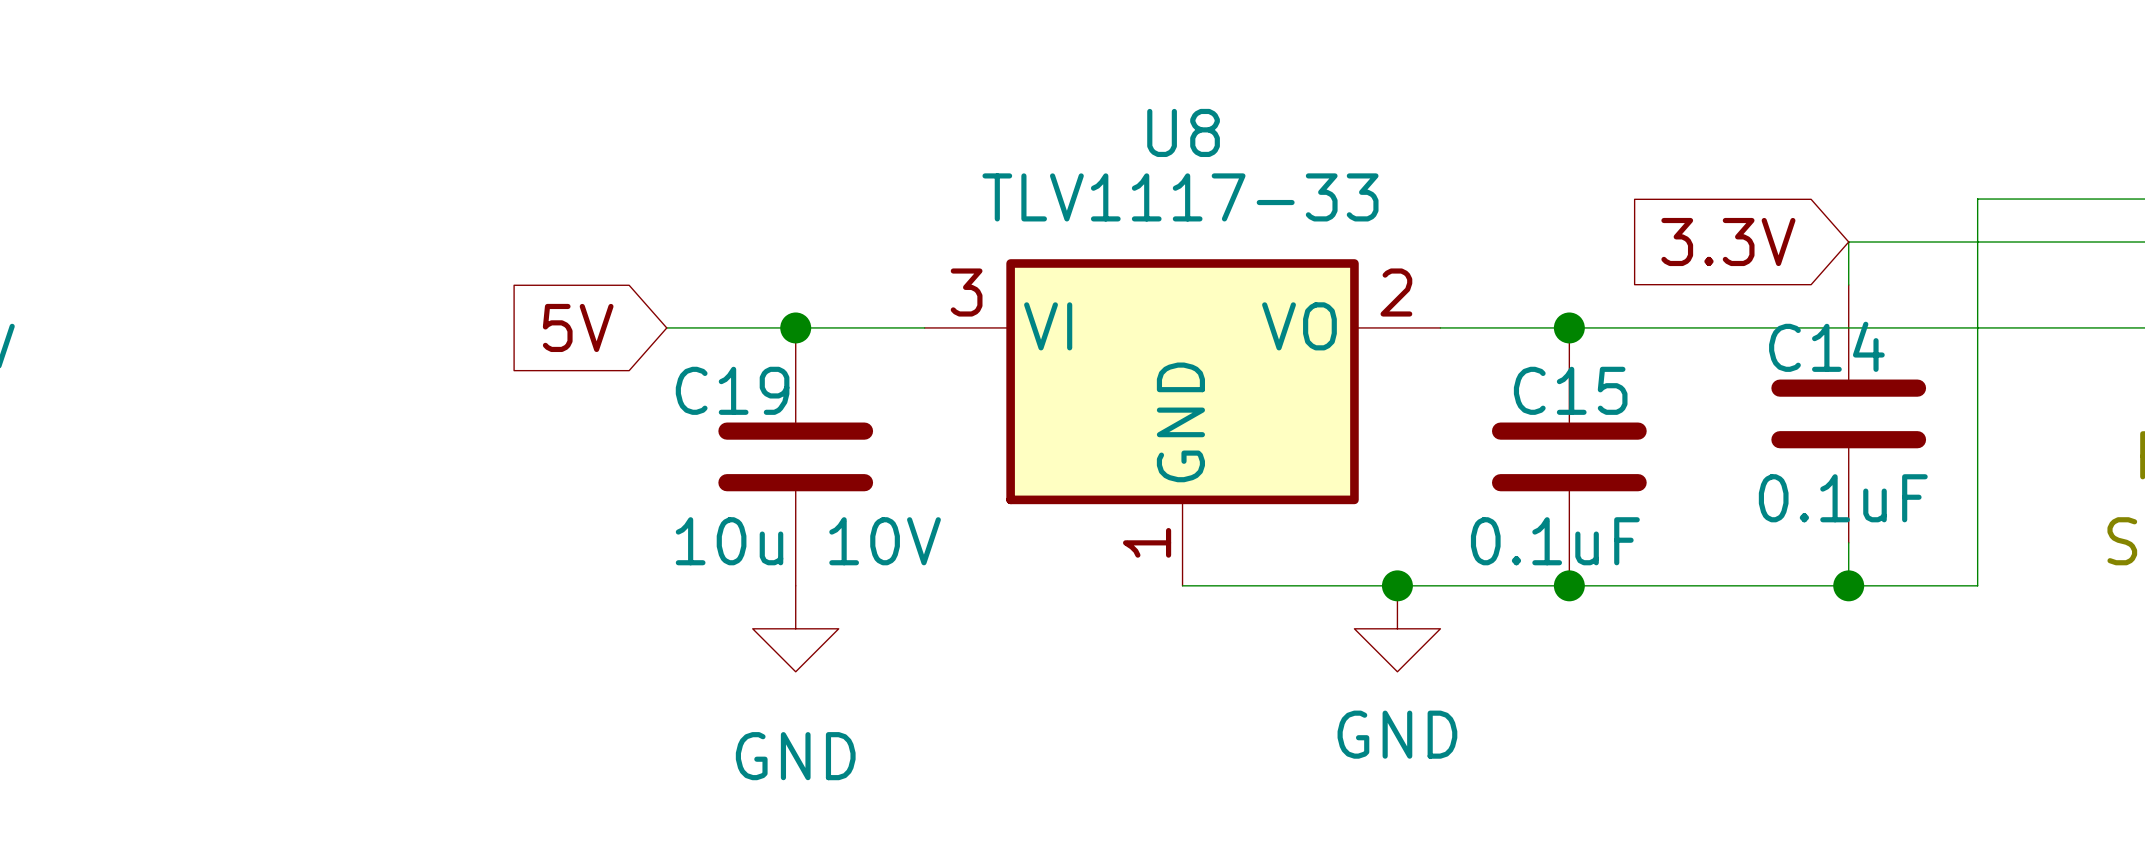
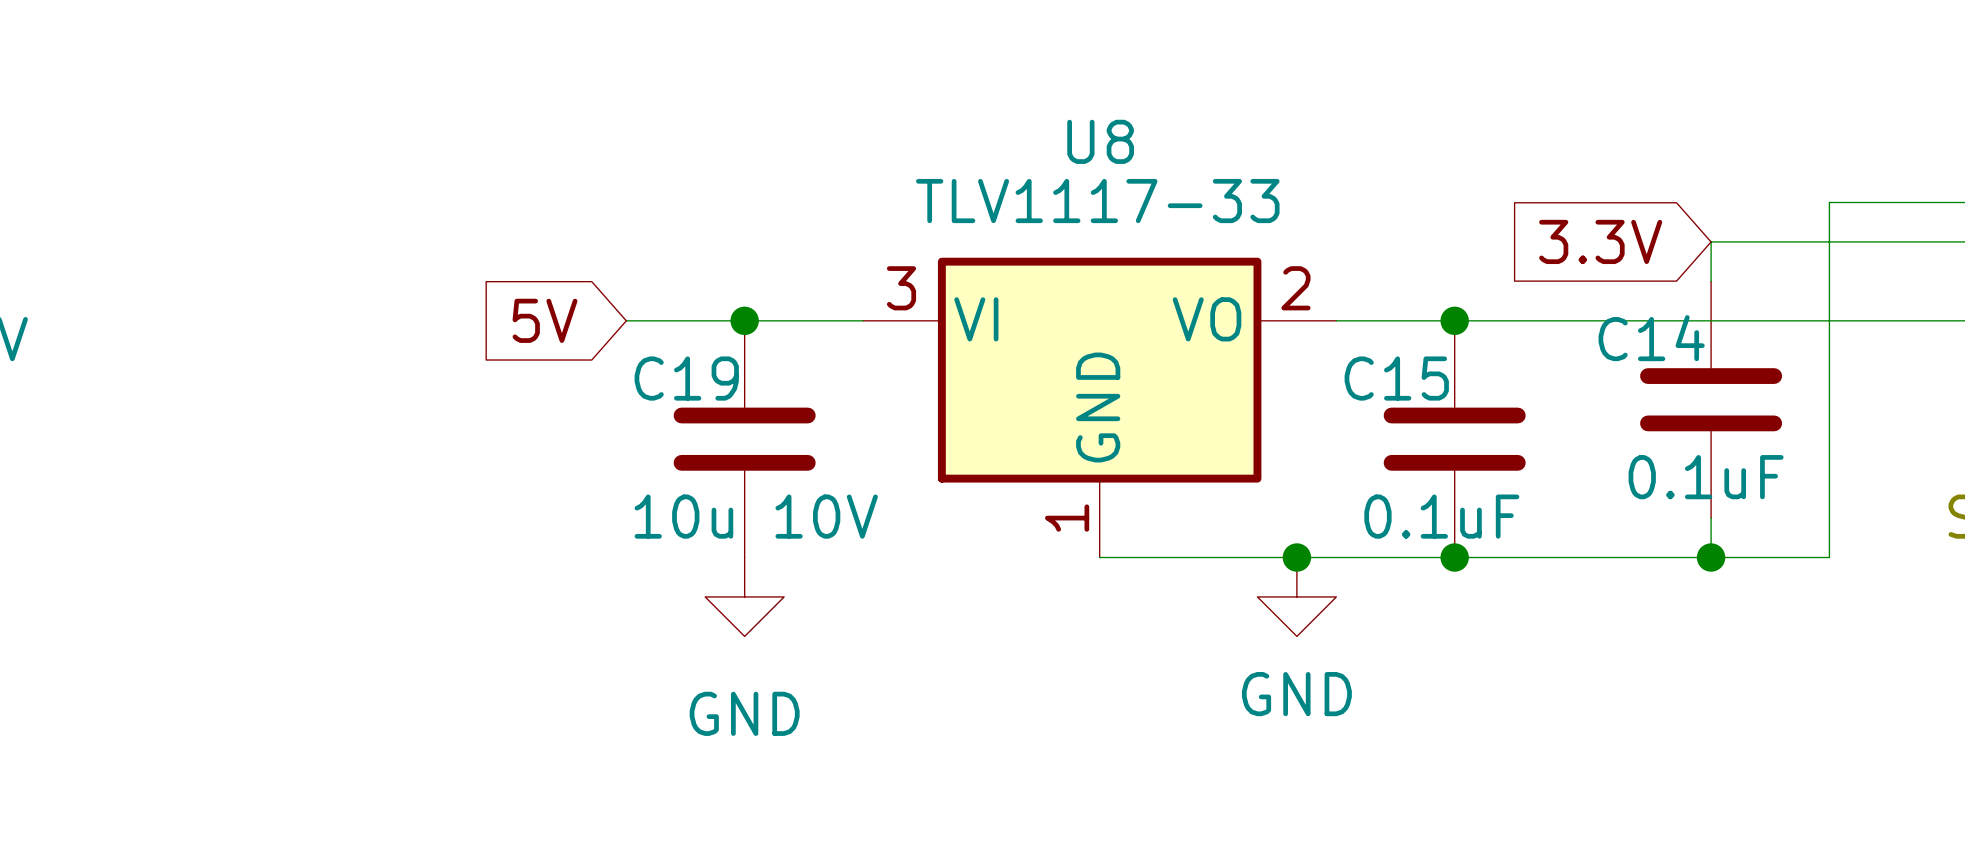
C14 name position: C14 (1826, 346) -> C14 (1651, 338)
C15 name position: C15 (1570, 390) -> C15 (1396, 378)

